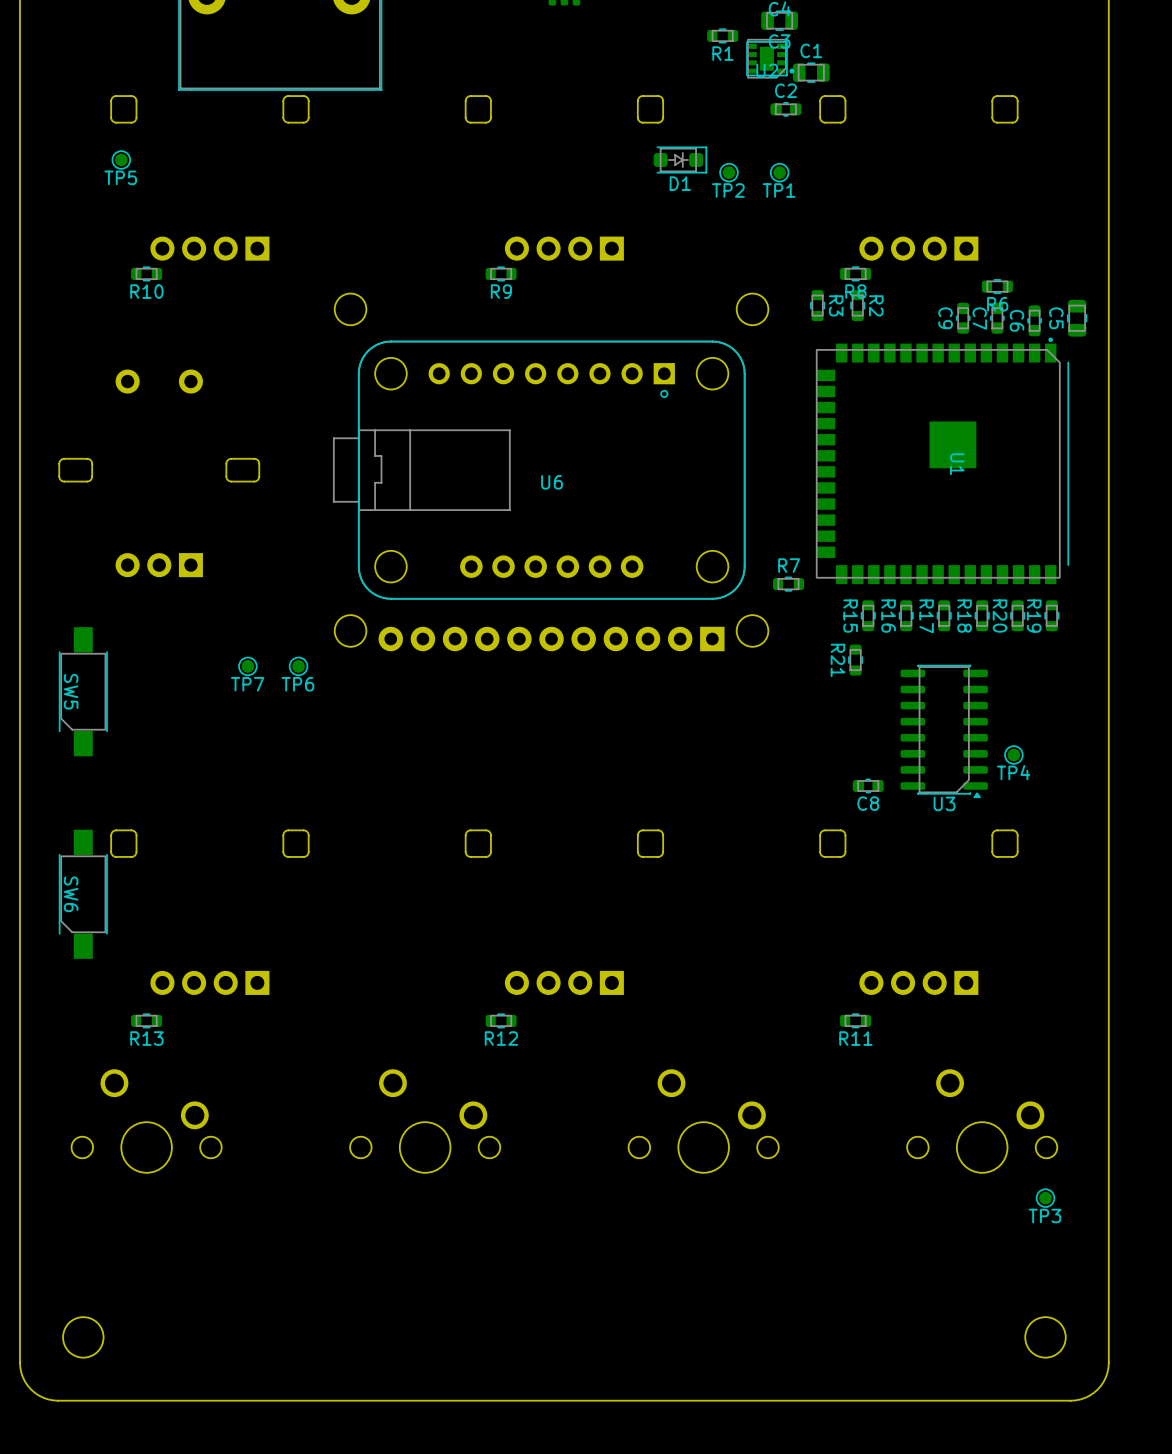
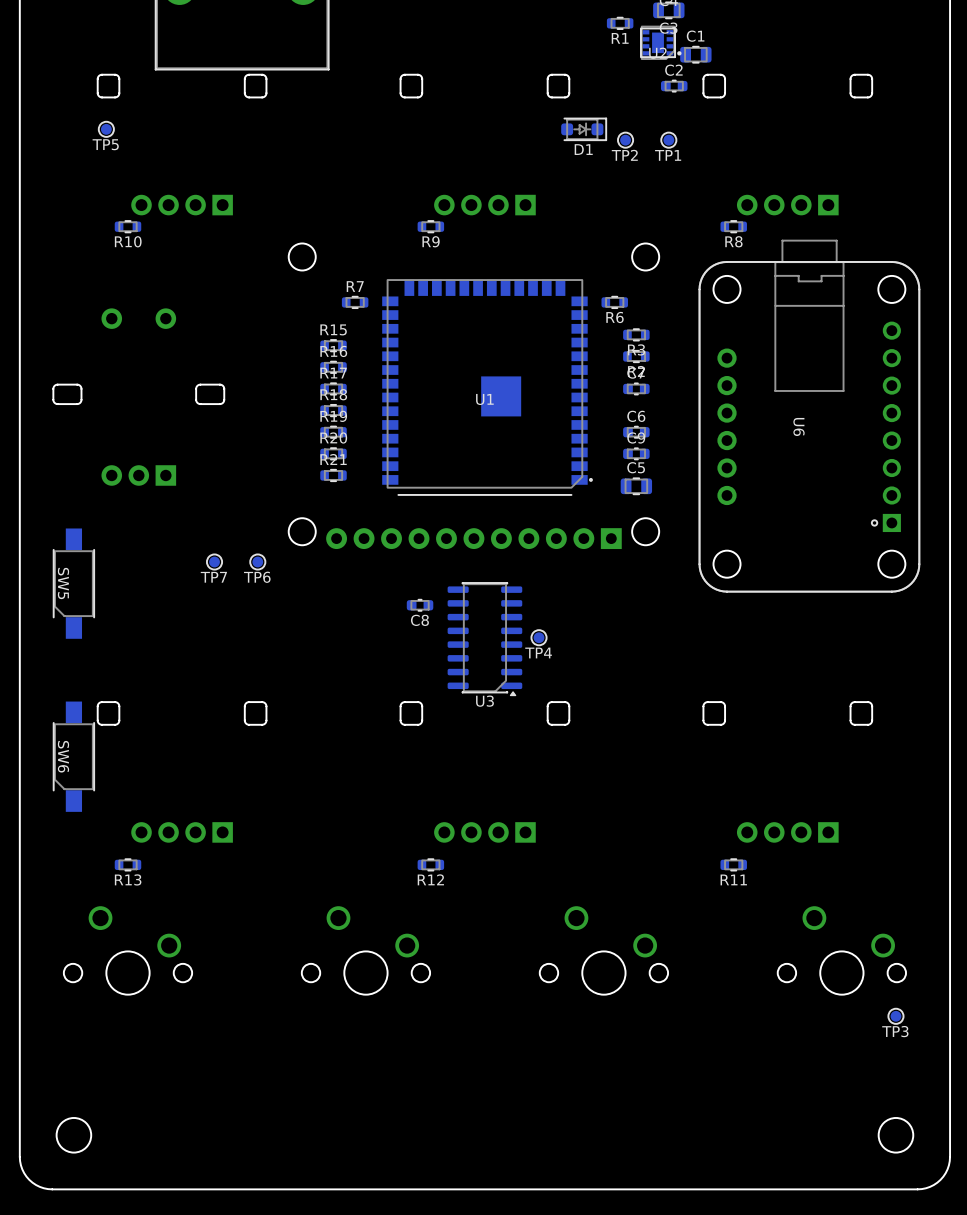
R6 position: (997, 286) -> (614, 302)
R3 rotation: 0° (817, 305) -> 90° clockwise (636, 334)
R3 position: (817, 305) -> (636, 334)
R2 rotation: 0° (857, 305) -> 90° clockwise (636, 356)
R2 position: (857, 305) -> (636, 356)
C9 rotation: 0° (963, 318) -> 90° clockwise (636, 453)
C9 position: (963, 318) -> (636, 453)
C7 rotation: 0° (997, 318) -> 90° clockwise (636, 388)
C7 position: (997, 318) -> (636, 388)
C5 rotation: 0° (1077, 318) -> 90° clockwise (636, 486)
C5 position: (1077, 318) -> (636, 486)
C6 rotation: 0° (1034, 320) -> 90° clockwise (636, 432)
C6 position: (1034, 320) -> (636, 432)
U1 rotation: 0° (942, 460) -> 90° clockwise (487, 387)
U1 position: (942, 460) -> (487, 387)
U6 rotation: 0° (539, 470) -> 90° clockwise (809, 416)
U6 position: (539, 470) -> (809, 416)
R7 position: (788, 584) -> (355, 302)
R15 rotation: 0° (868, 615) -> 90° clockwise (333, 345)
R15 position: (868, 615) -> (333, 345)
R16 rotation: 0° (906, 615) -> 90° clockwise (333, 367)
R16 position: (906, 615) -> (333, 367)
R17 rotation: 0° (944, 615) -> 90° clockwise (333, 388)
R17 position: (944, 615) -> (333, 388)
R18 rotation: 0° (982, 615) -> 90° clockwise (333, 410)
R18 position: (982, 615) -> (333, 410)
R20 rotation: 0° (1017, 615) -> 90° clockwise (333, 453)
R20 position: (1017, 615) -> (333, 453)
R19 rotation: 0° (1051, 615) -> 90° clockwise (333, 432)
R19 position: (1051, 615) -> (333, 432)
R21 rotation: 0° (855, 660) -> 90° clockwise (333, 475)
R21 position: (855, 660) -> (333, 475)
U3 position: (944, 731) -> (484, 639)
TP4 position: (1013, 755) -> (539, 637)
C8 position: (868, 785) -> (420, 605)

